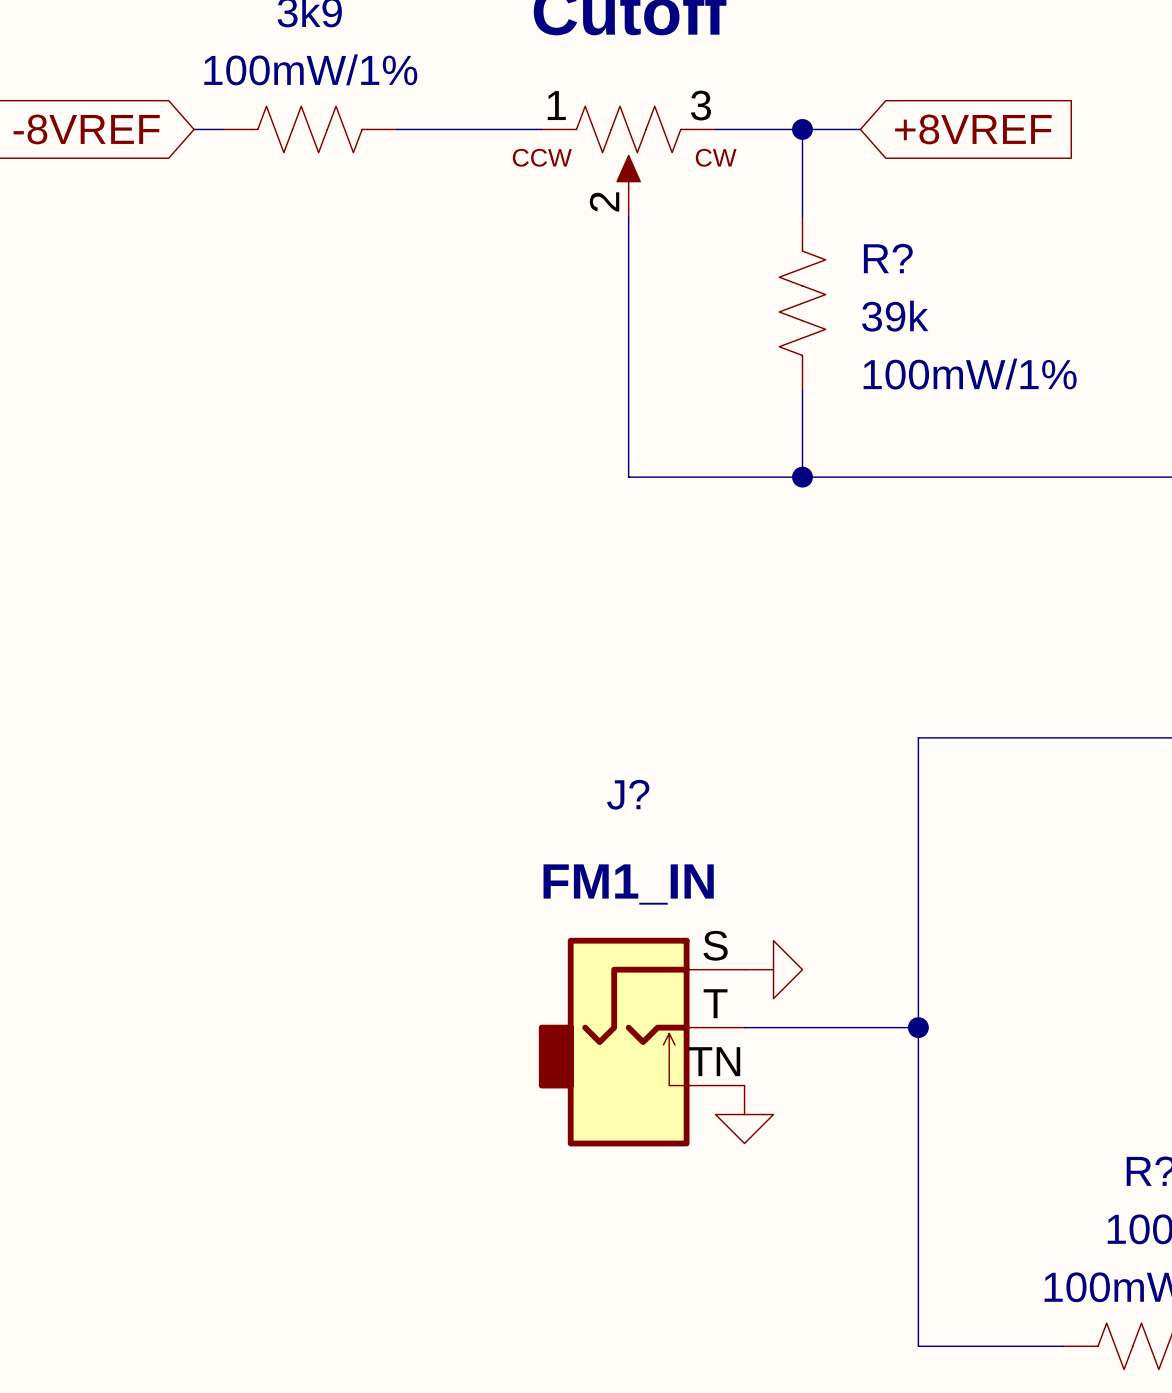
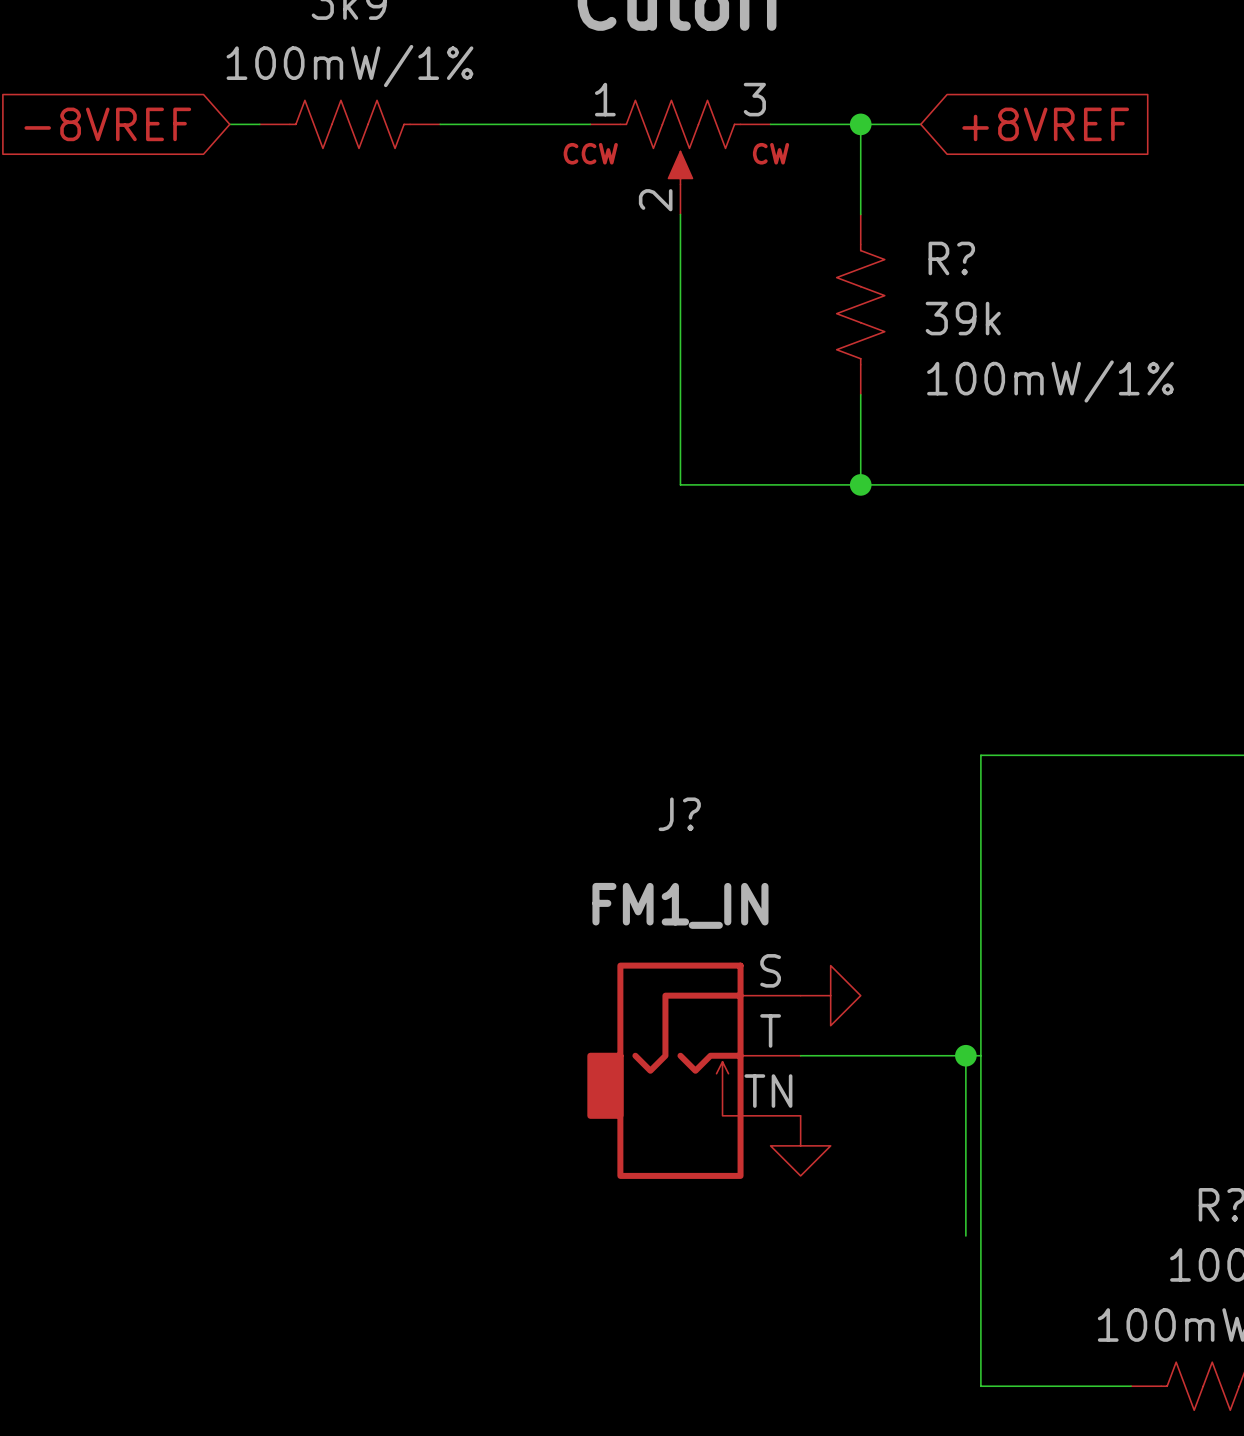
wire: none -> (965, 1055) (965, 1236)
junction position: (918, 1027) -> (965, 1055)

